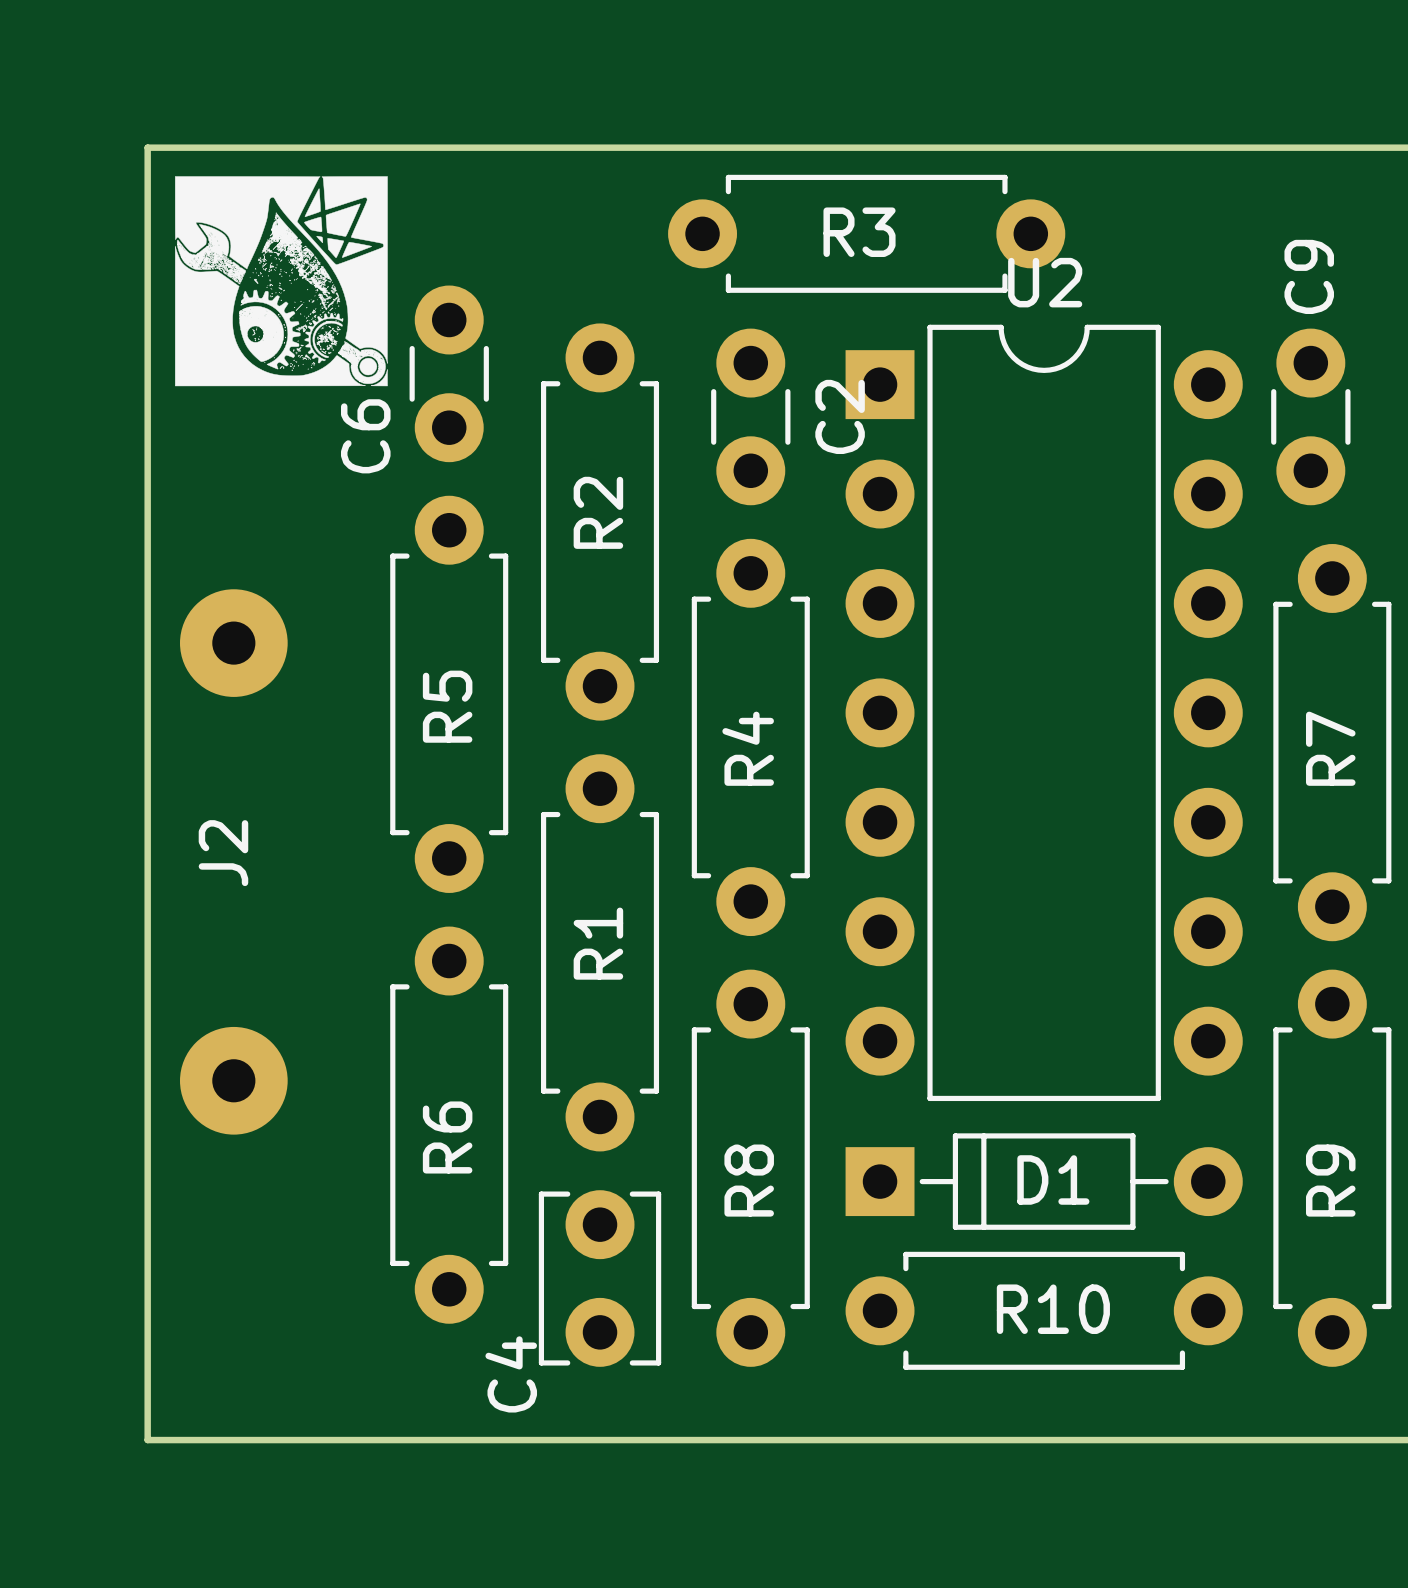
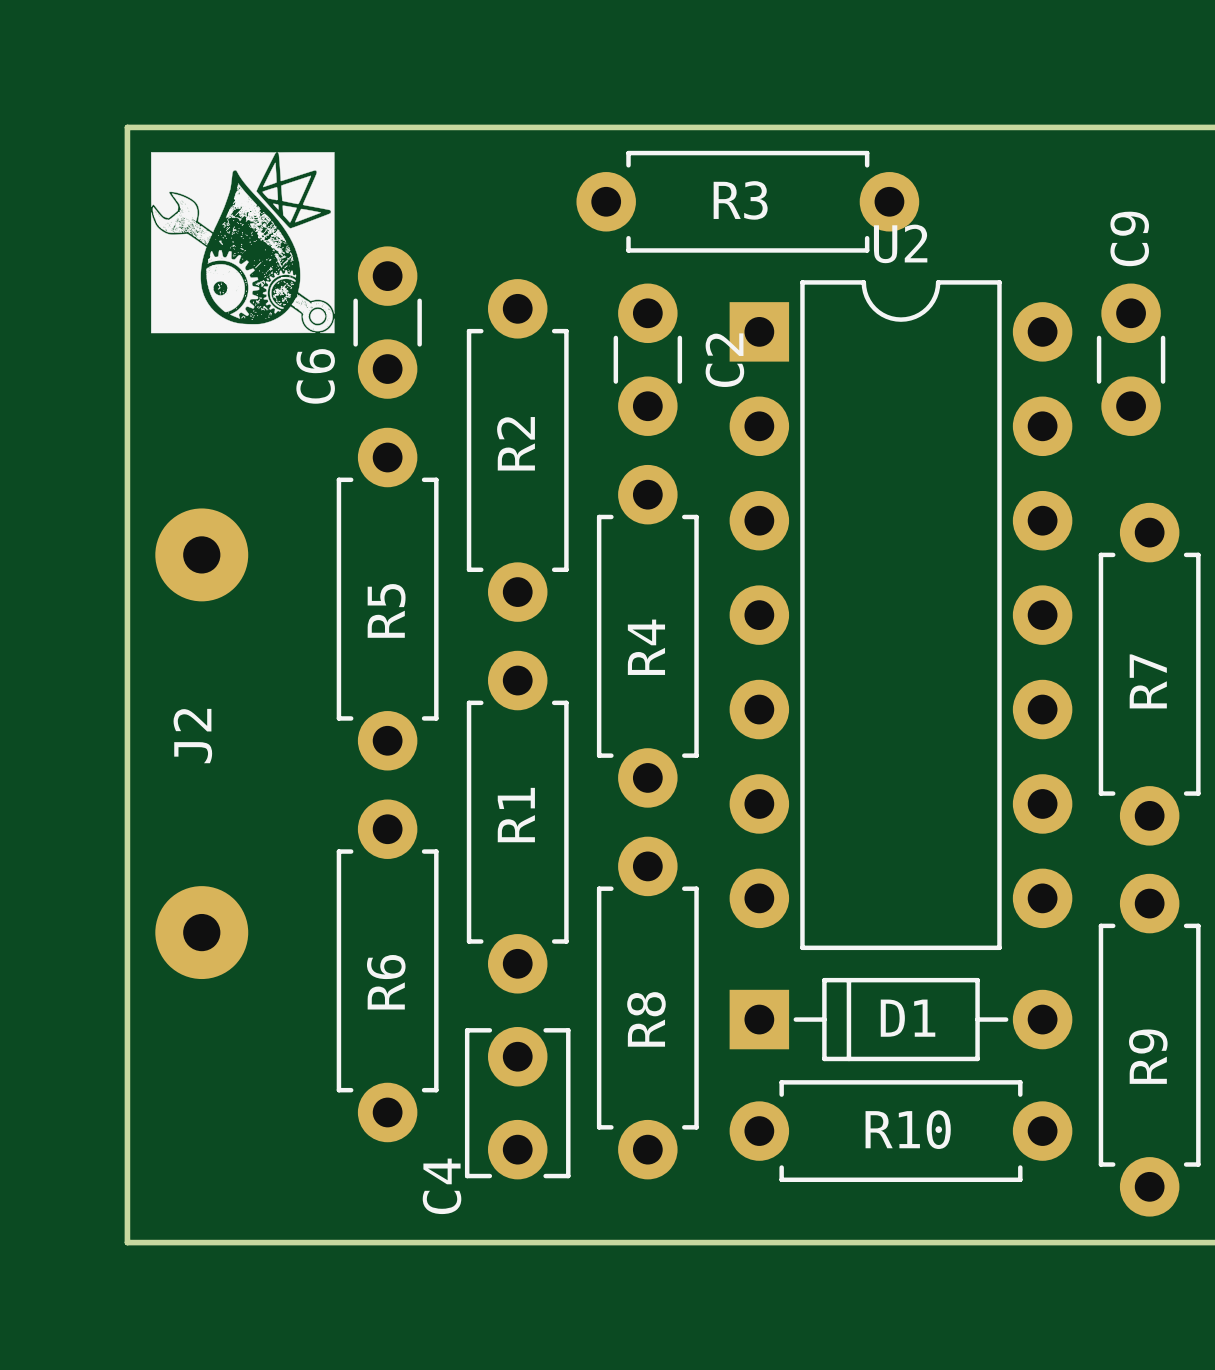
R7 position: (1332, 742) -> (1149, 674)
R9 position: (1332, 1168) -> (1149, 1045)

